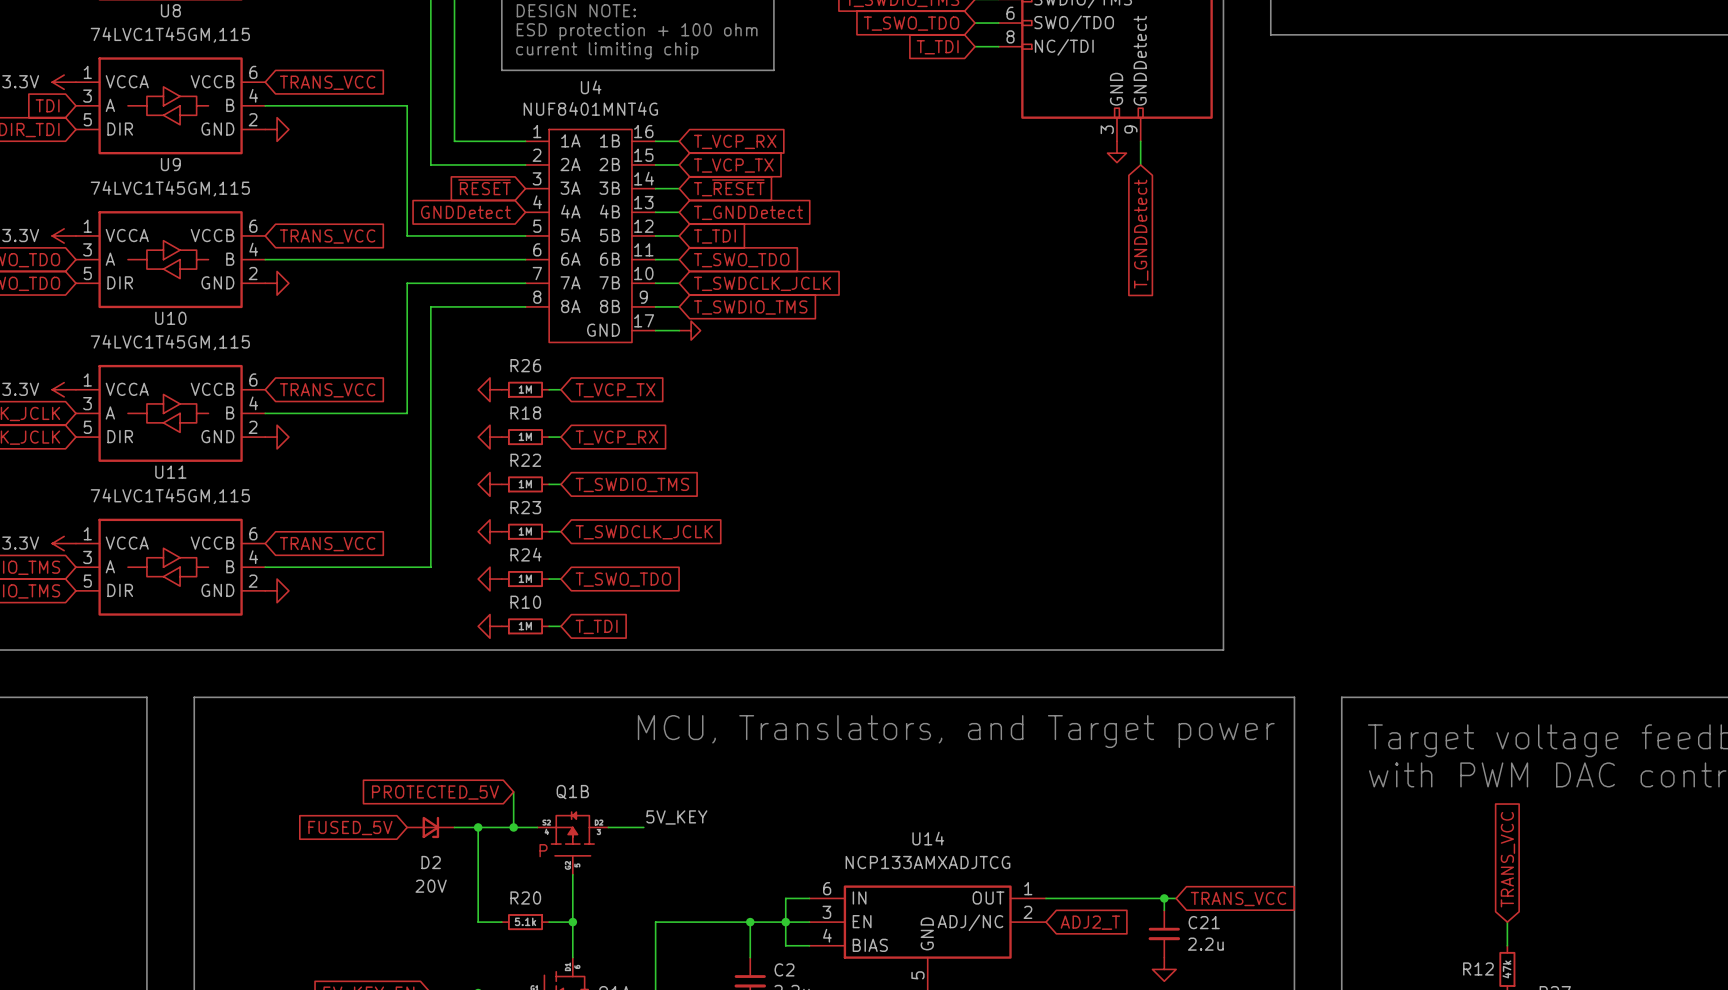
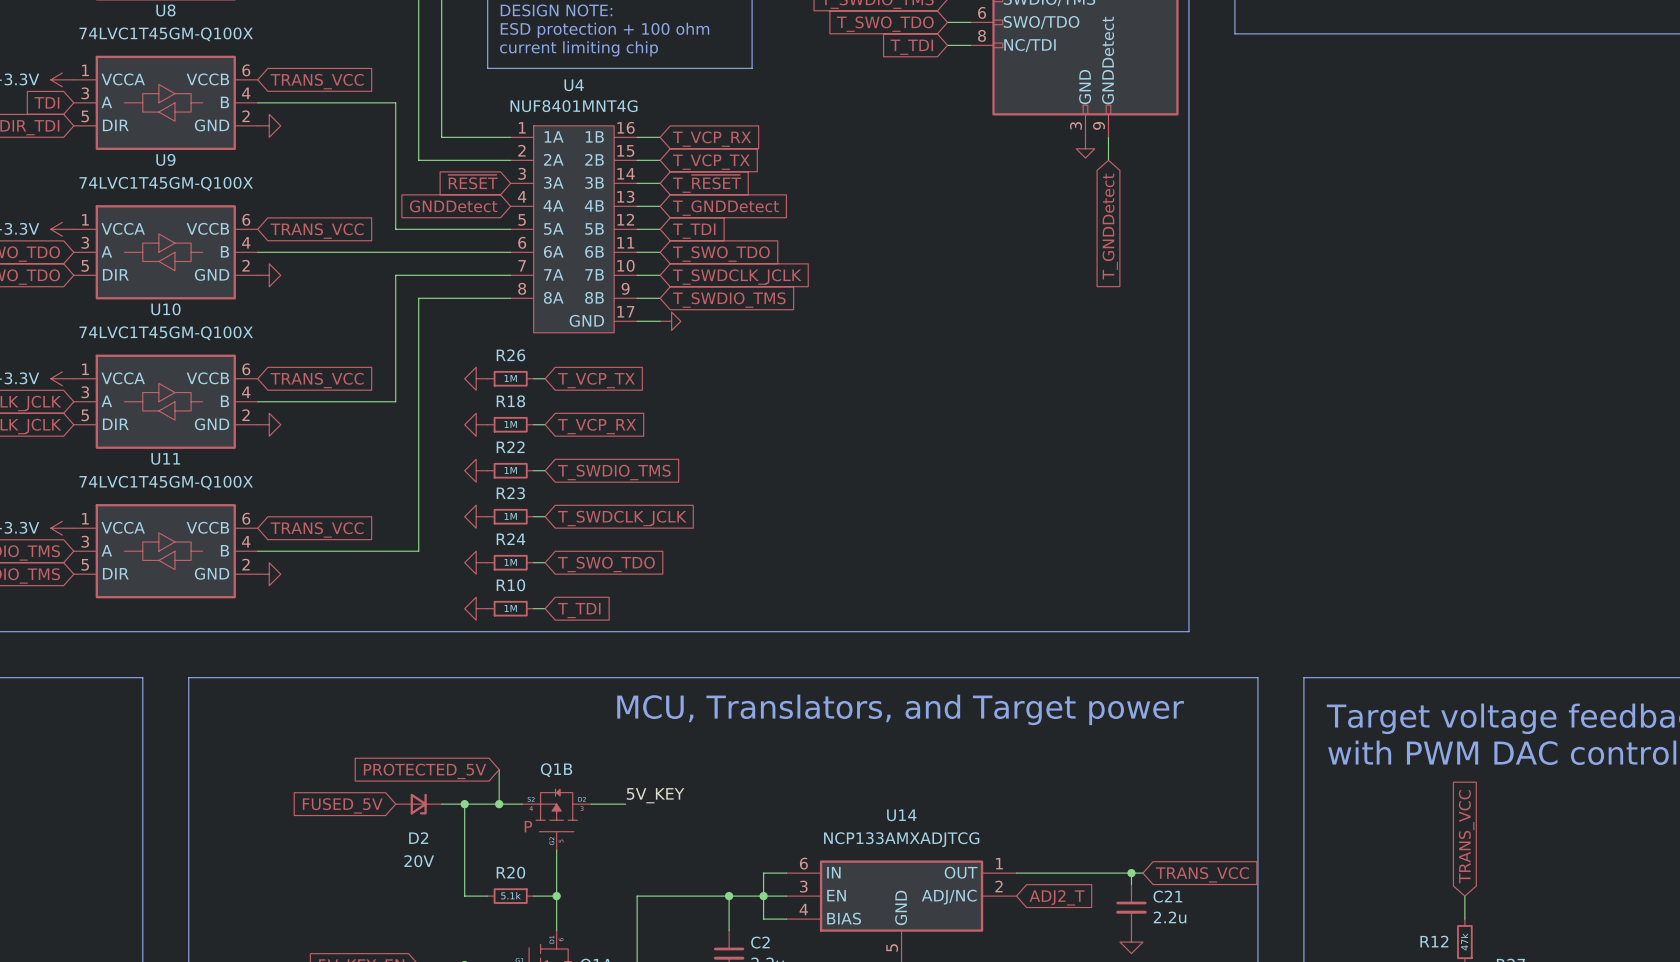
U8 value: 74LVC1T45GM,115 (170, 34) -> 74LVC1T45GM-Q100X (166, 34)
U9 value: 74LVC1T45GM,115 (170, 188) -> 74LVC1T45GM-Q100X (166, 183)
U10 value: 74LVC1T45GM,115 (170, 342) -> 74LVC1T45GM-Q100X (166, 333)
U11 value: 74LVC1T45GM,115 (170, 496) -> 74LVC1T45GM-Q100X (166, 482)

